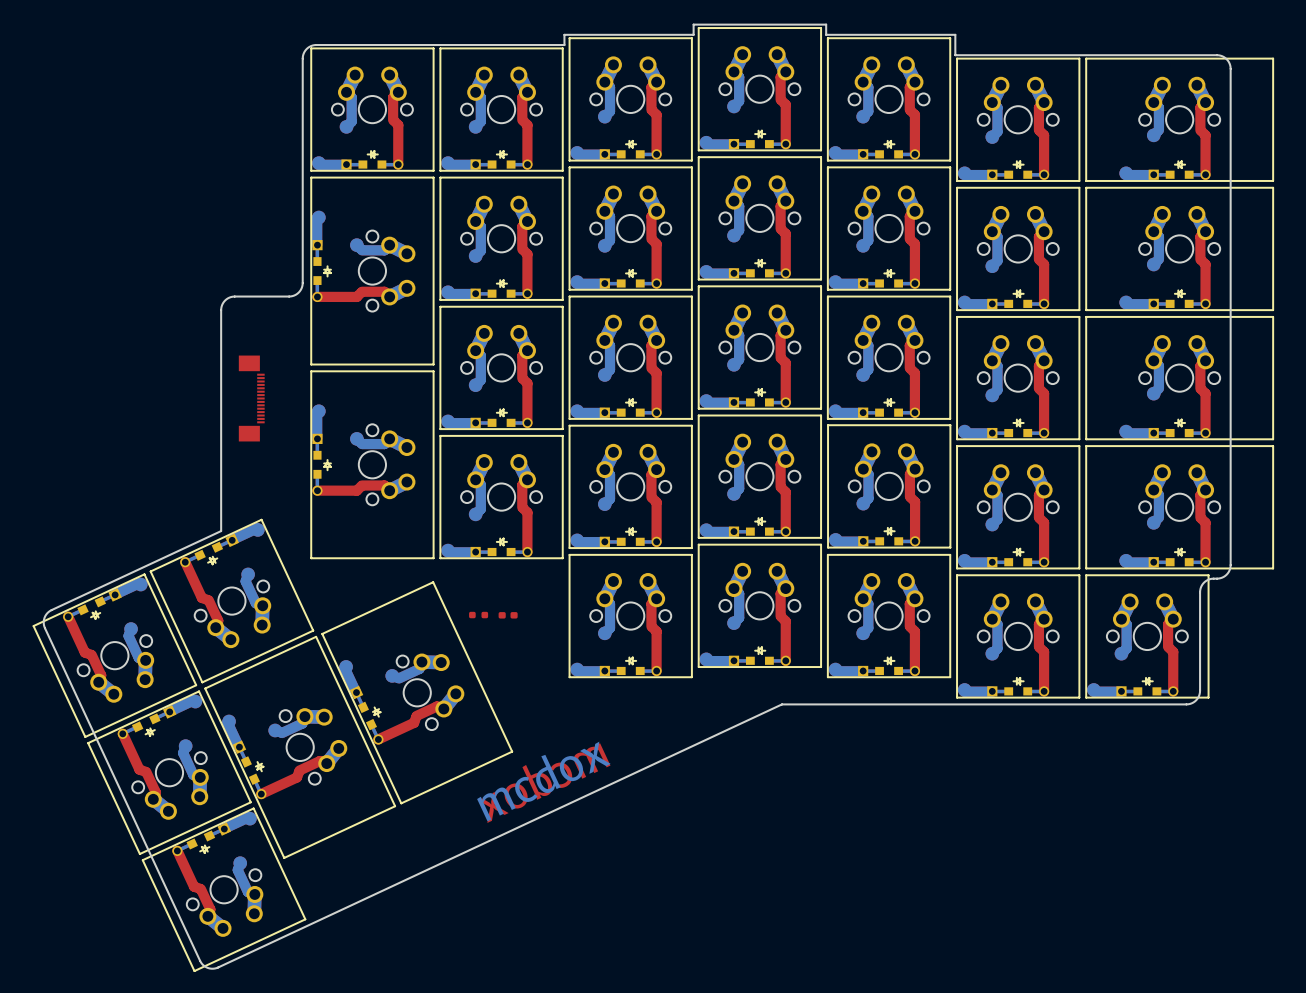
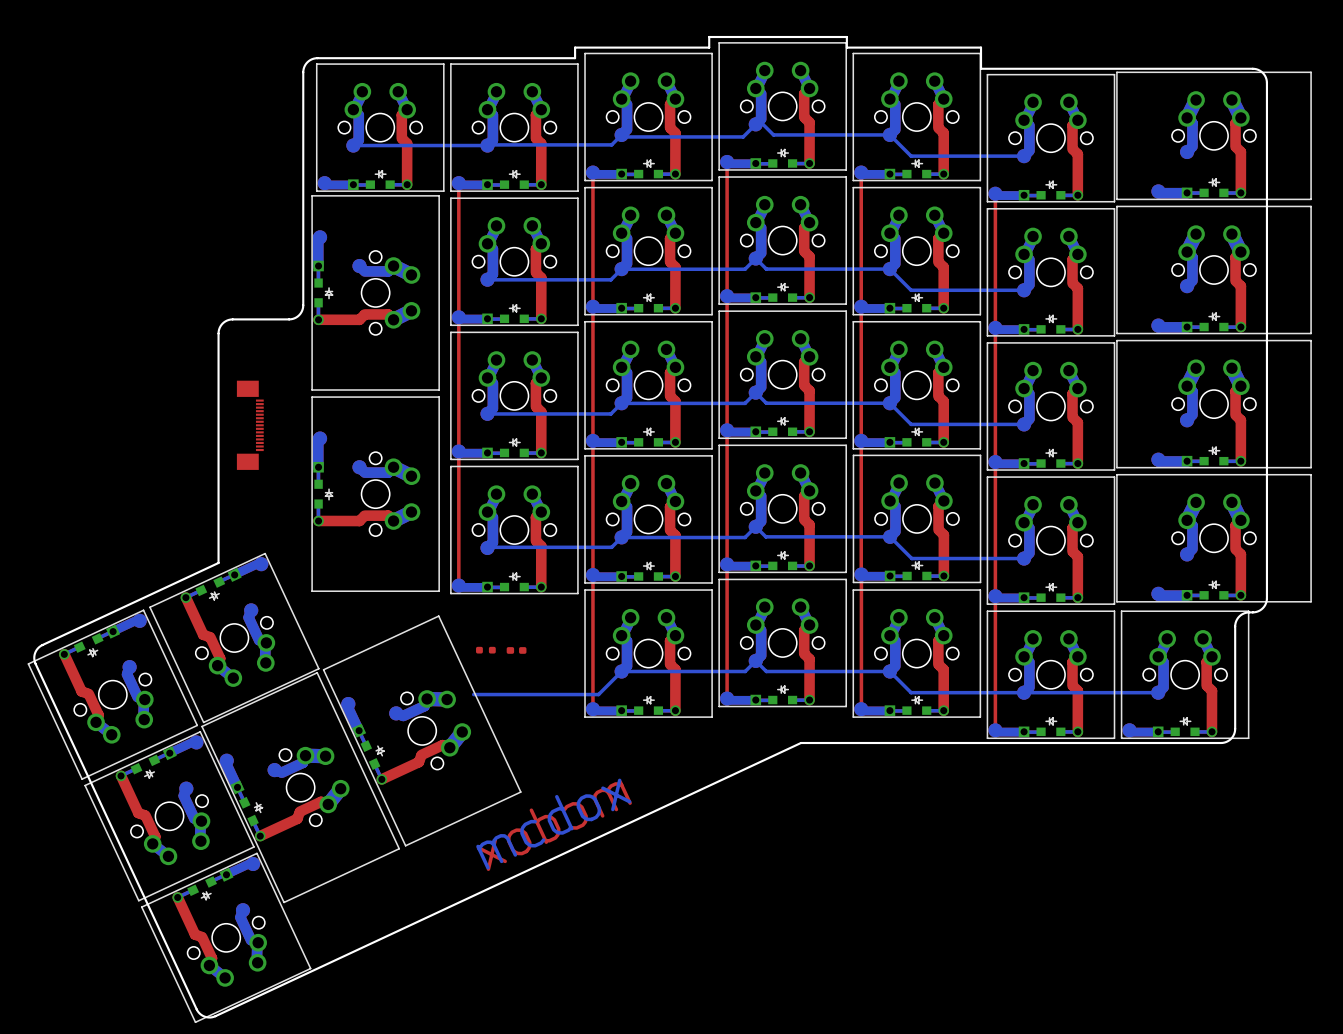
part footprint: [698, 27, 822, 151] -> [718, 42, 847, 171]
part footprint: [569, 37, 693, 162] -> [584, 52, 713, 182]
part footprint: [827, 37, 951, 162] -> [852, 52, 981, 182]
part footprint: [310, 47, 435, 172] -> [316, 63, 445, 192]
part footprint: [439, 47, 564, 172] -> [450, 63, 579, 192]
part footprint: [956, 58, 1080, 182] -> [986, 74, 1116, 203]
bottom track: none -> (353, 145) (611, 144) (621, 134) (623, 136) (743, 136) (759, 120) (773, 134) (889, 134) (911, 156) (1024, 156)
top track: none -> (727, 162) (727, 698)
top track: none -> (592, 172) (592, 709)
top track: none -> (861, 172) (861, 709)
part footprint: [698, 156, 822, 281] -> [718, 176, 847, 305]
top track: none -> (458, 183) (458, 585)
part footprint: [569, 166, 693, 291] -> [584, 187, 713, 316]
part footprint: [827, 166, 951, 291] -> [852, 187, 981, 316]
top track: none -> (995, 193) (995, 730)
part footprint: [439, 177, 564, 301] -> [450, 197, 579, 326]
part footprint: [956, 187, 1080, 311] -> [986, 208, 1116, 337]
bottom track: none -> (487, 279) (610, 279) (621, 269) (745, 269) (755, 258) (766, 269) (889, 269) (911, 290) (1024, 290)
part footprint: [698, 285, 822, 410] -> [718, 310, 847, 439]
part footprint: [569, 296, 693, 420] -> [584, 321, 713, 450]
part footprint: [827, 296, 951, 420] -> [852, 321, 981, 450]
part footprint: [439, 306, 564, 430] -> [450, 331, 579, 460]
part footprint: [956, 316, 1080, 440] -> [986, 342, 1116, 471]
bottom track: none -> (487, 413) (610, 413) (621, 403) (745, 403) (755, 392) (766, 403) (889, 403) (911, 424) (1024, 424)
part footprint: [698, 414, 822, 539] -> [718, 444, 847, 573]
part footprint: [827, 424, 951, 549] -> [852, 454, 982, 583]
part footprint: [569, 425, 693, 549] -> [584, 455, 713, 584]
part footprint: [439, 435, 564, 559] -> [450, 465, 579, 595]
part footprint: [956, 445, 1080, 569] -> [986, 476, 1116, 605]
bottom track: none -> (625, 533) (611, 547) (487, 547)
bottom track: none -> (621, 537) (745, 537) (755, 526) (765, 536) (890, 536) (911, 558) (1024, 558)
part footprint: [150, 519, 314, 683] -> [149, 553, 320, 723]
part footprint: [698, 544, 822, 668] -> [718, 578, 847, 708]
part footprint: [569, 554, 693, 678] -> [584, 589, 713, 718]
part footprint: [827, 554, 951, 678] -> [852, 589, 981, 718]
part footprint: [33, 573, 197, 738] -> [27, 609, 198, 780]
part footprint: [956, 574, 1080, 699] -> [986, 610, 1116, 739]
part footprint: [1085, 574, 1210, 699] -> [1121, 610, 1250, 739]
bottom track: none -> (1158, 692) (911, 692) (889, 671) (766, 671) (755, 660) (745, 671) (621, 671) (598, 694) (473, 694)
part footprint: [87, 690, 252, 855] -> [84, 731, 255, 902]
part footprint: [142, 807, 306, 972] -> [141, 852, 312, 1023]

